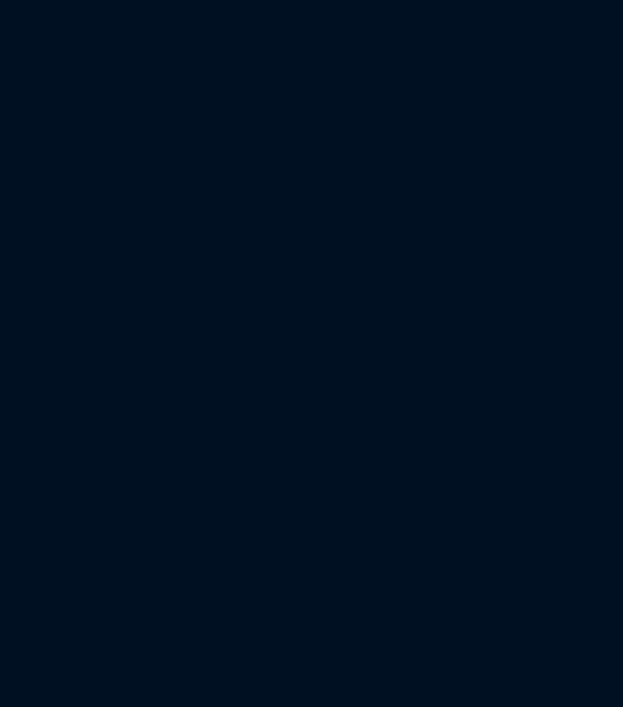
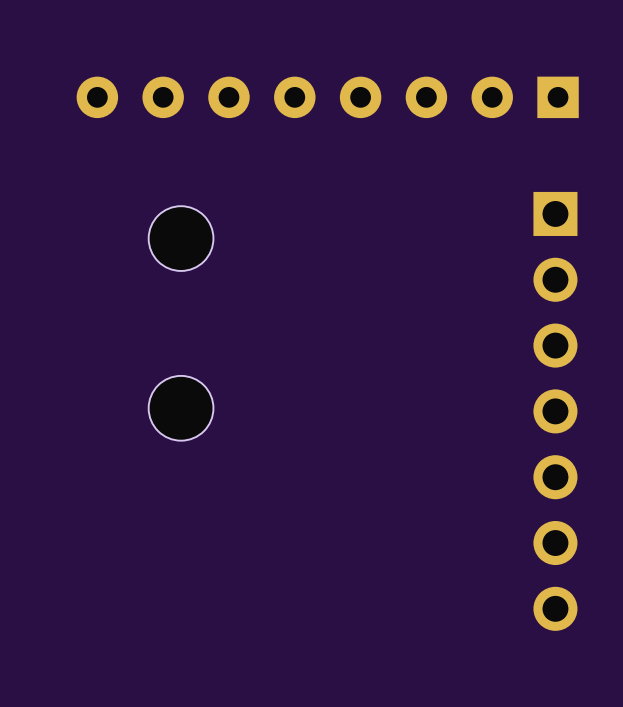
part: none -> (327, 97)
part: none -> (181, 238)
part: none -> (181, 408)
part: none -> (555, 411)

